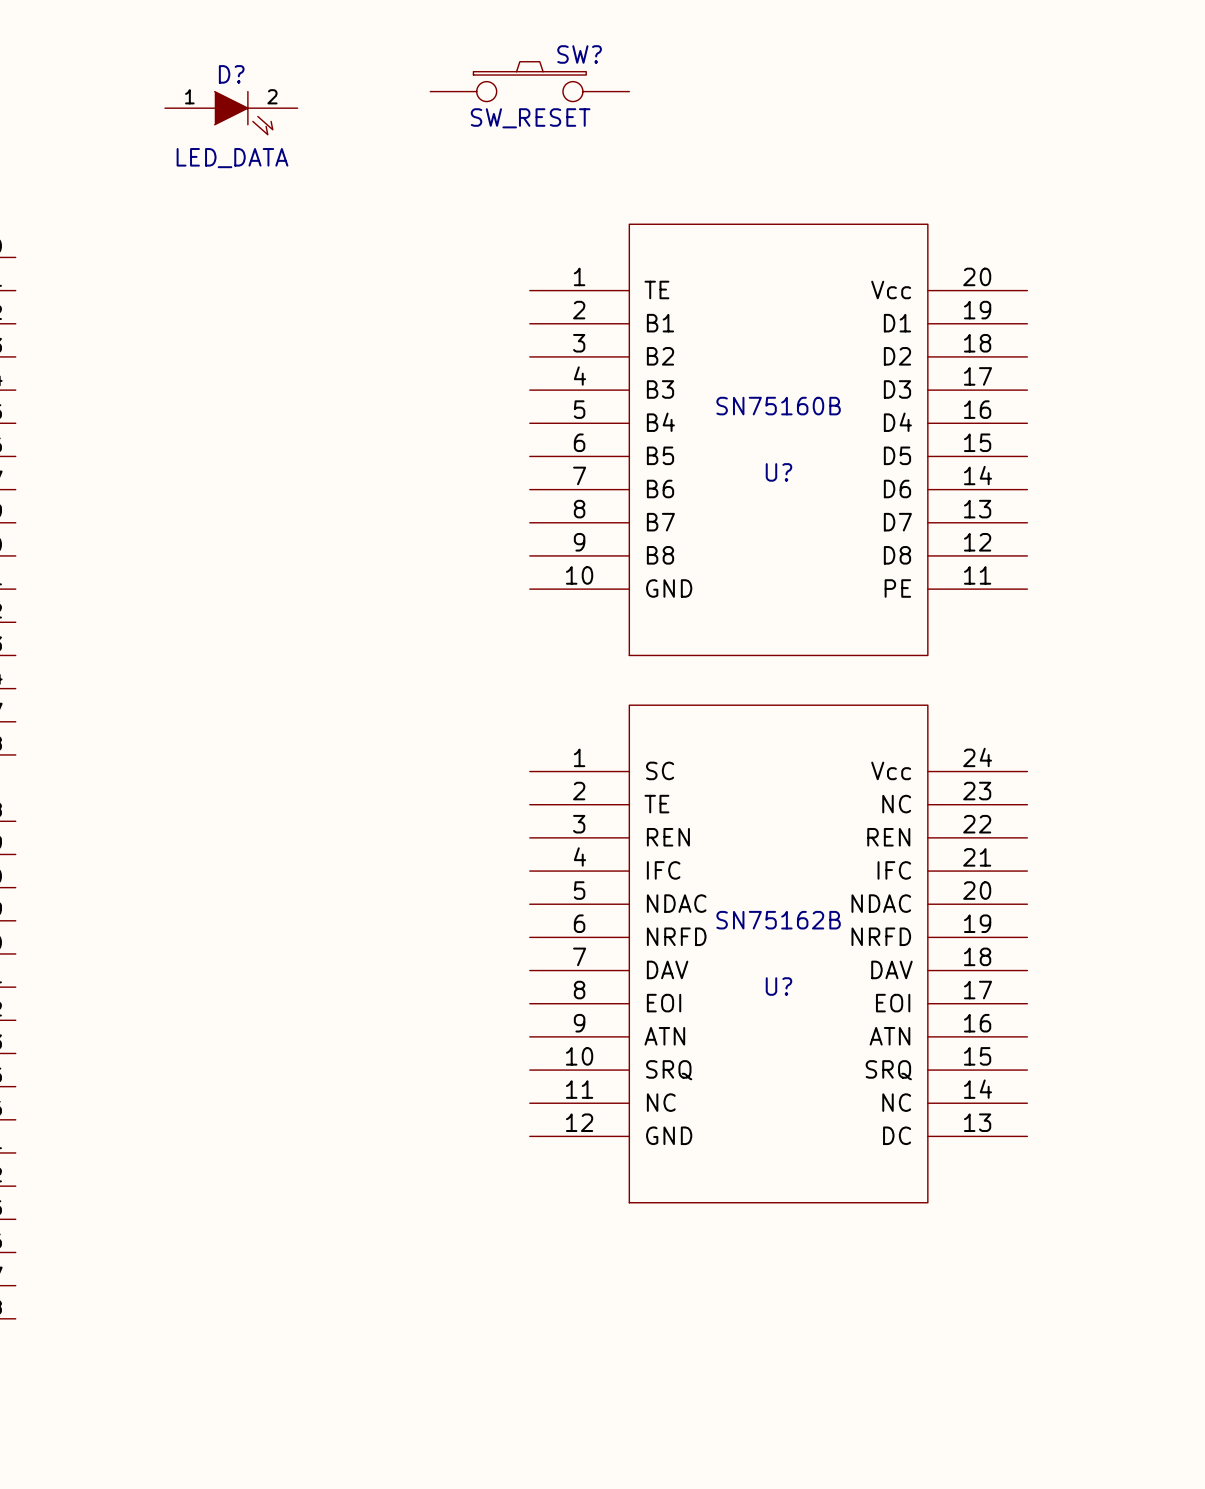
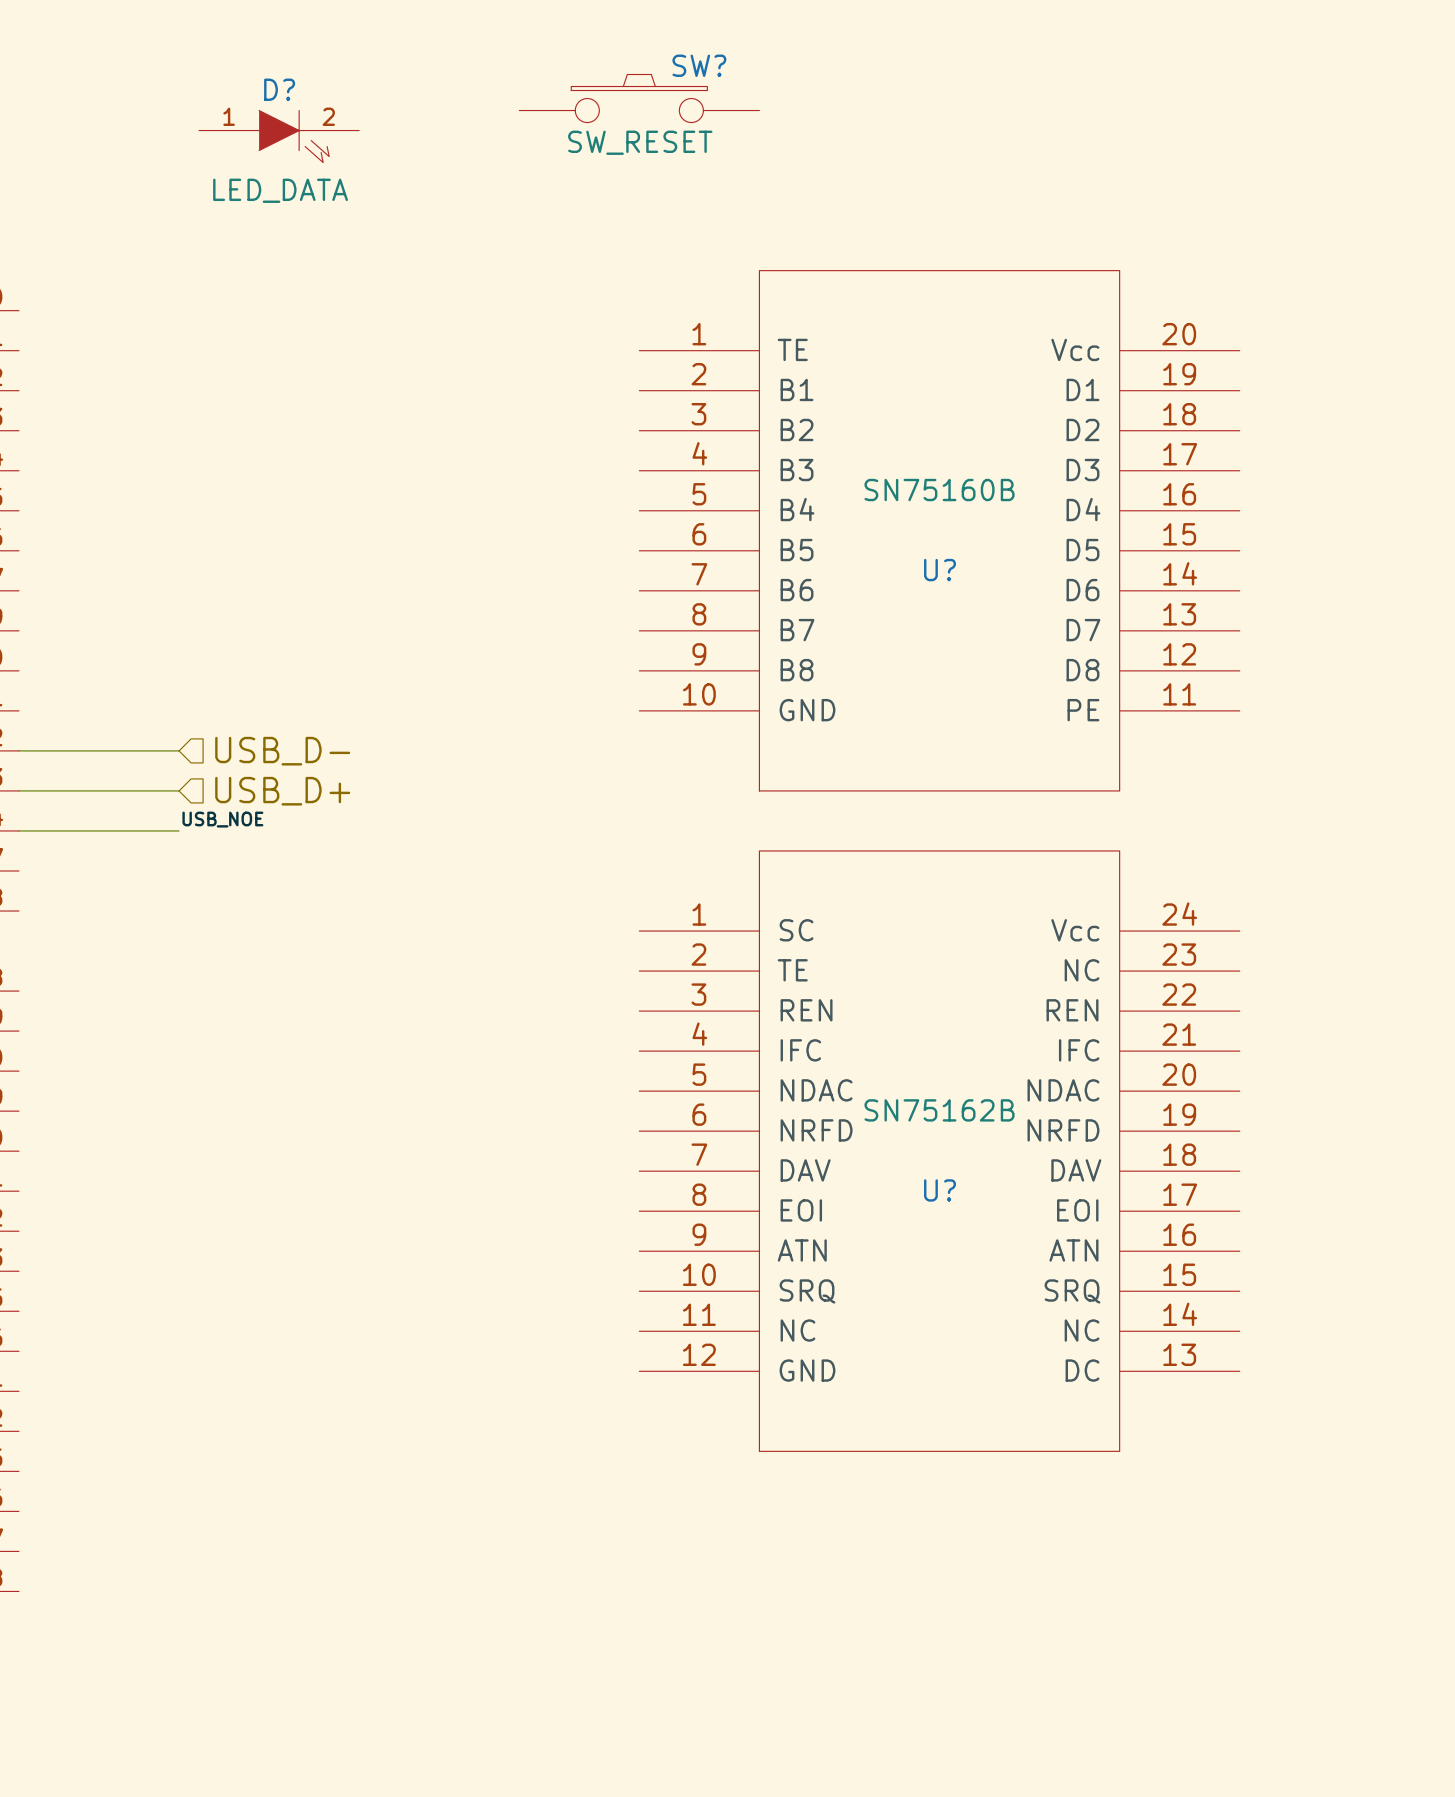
wire: none -> (18, 750) (179, 750)
hierarchical label: none -> USB_D- (282, 751)
wire: none -> (18, 790) (179, 790)
hierarchical label: none -> USB_D+ (282, 791)
label: none -> USB_NOE (222, 819)
wire: none -> (18, 830) (179, 830)

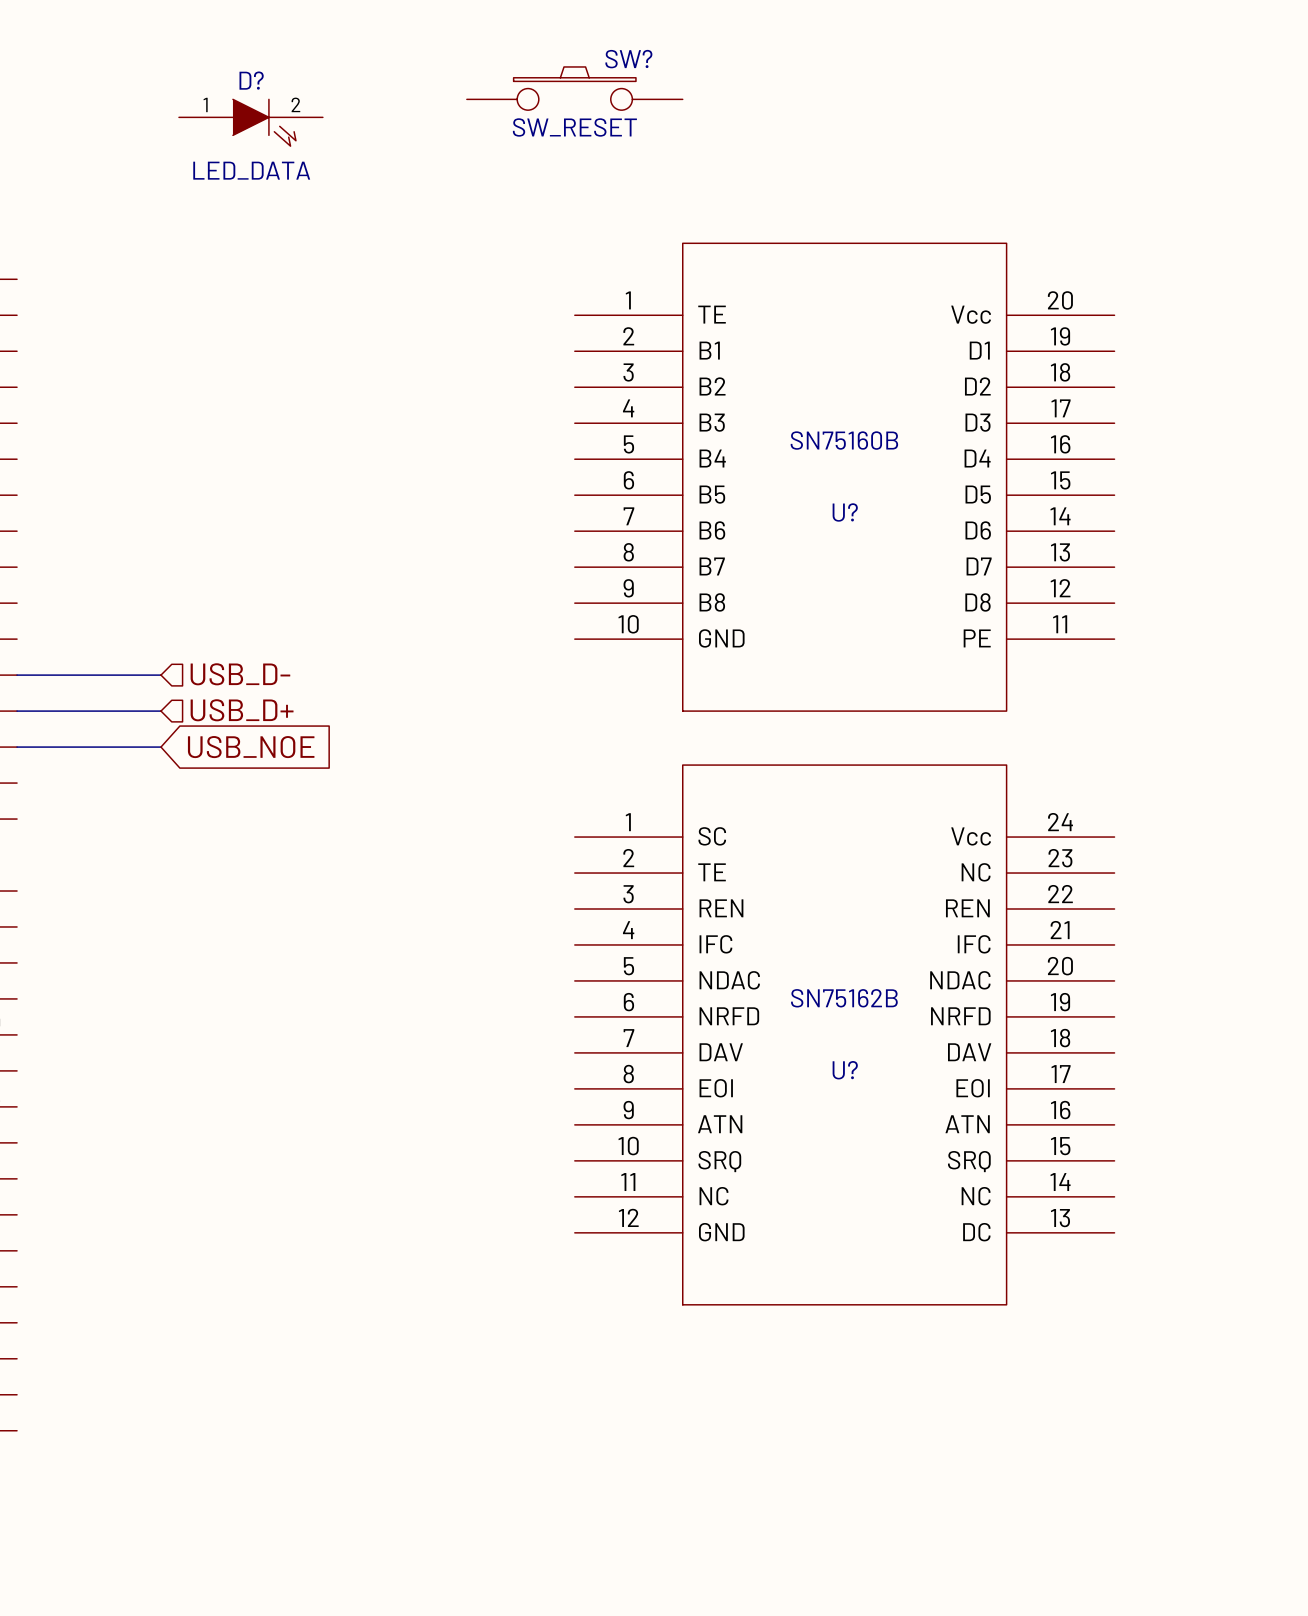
label: USB_NOE (222, 819) -> none
global label: none -> USB_NOE (251, 747)

